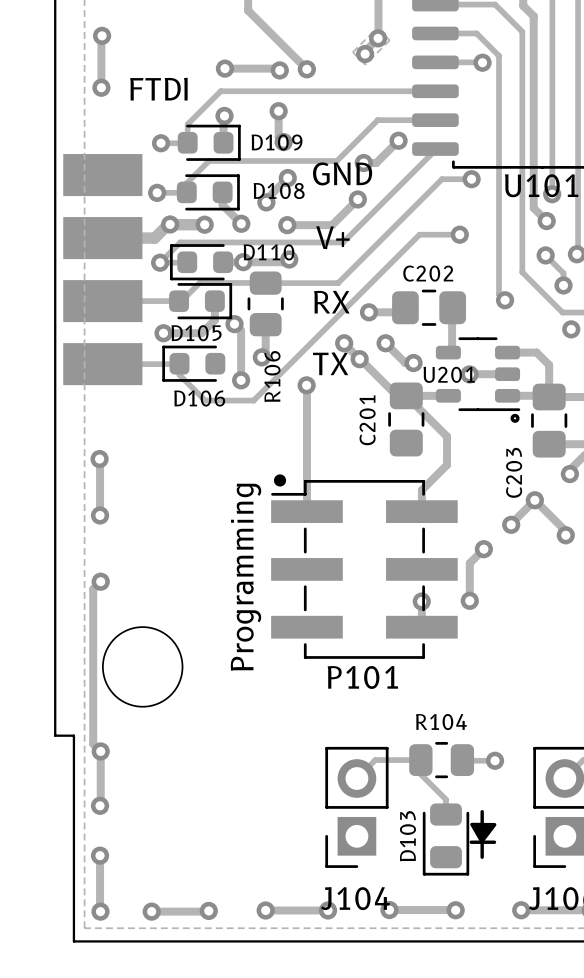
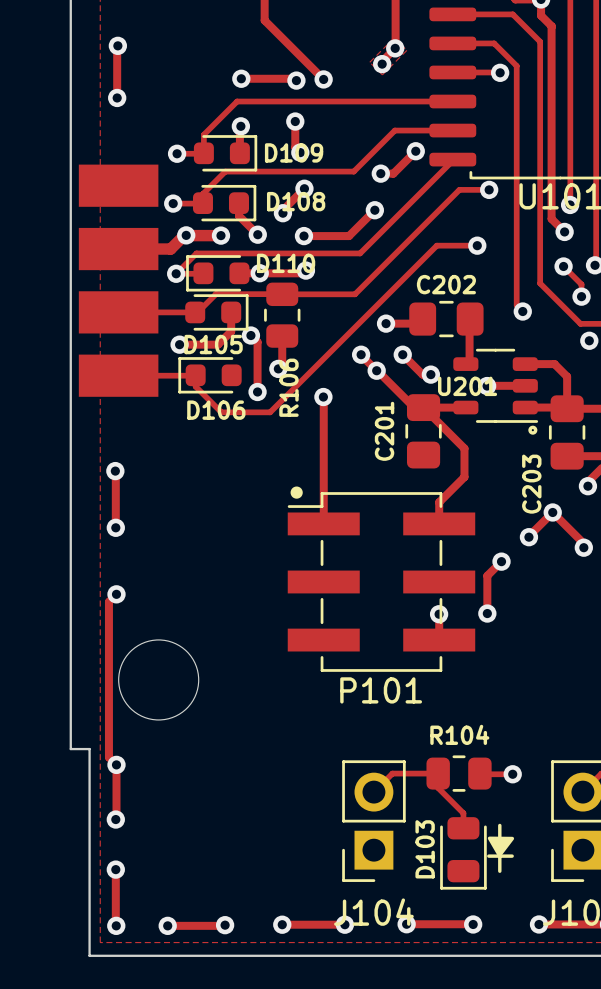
text: FTDI (158, 89) -> none
text: GND (342, 173) -> none
text: V+ (332, 237) -> none
text: RX (331, 302) -> none
text: TX (330, 363) -> none
text: Programming (246, 577) -> none

